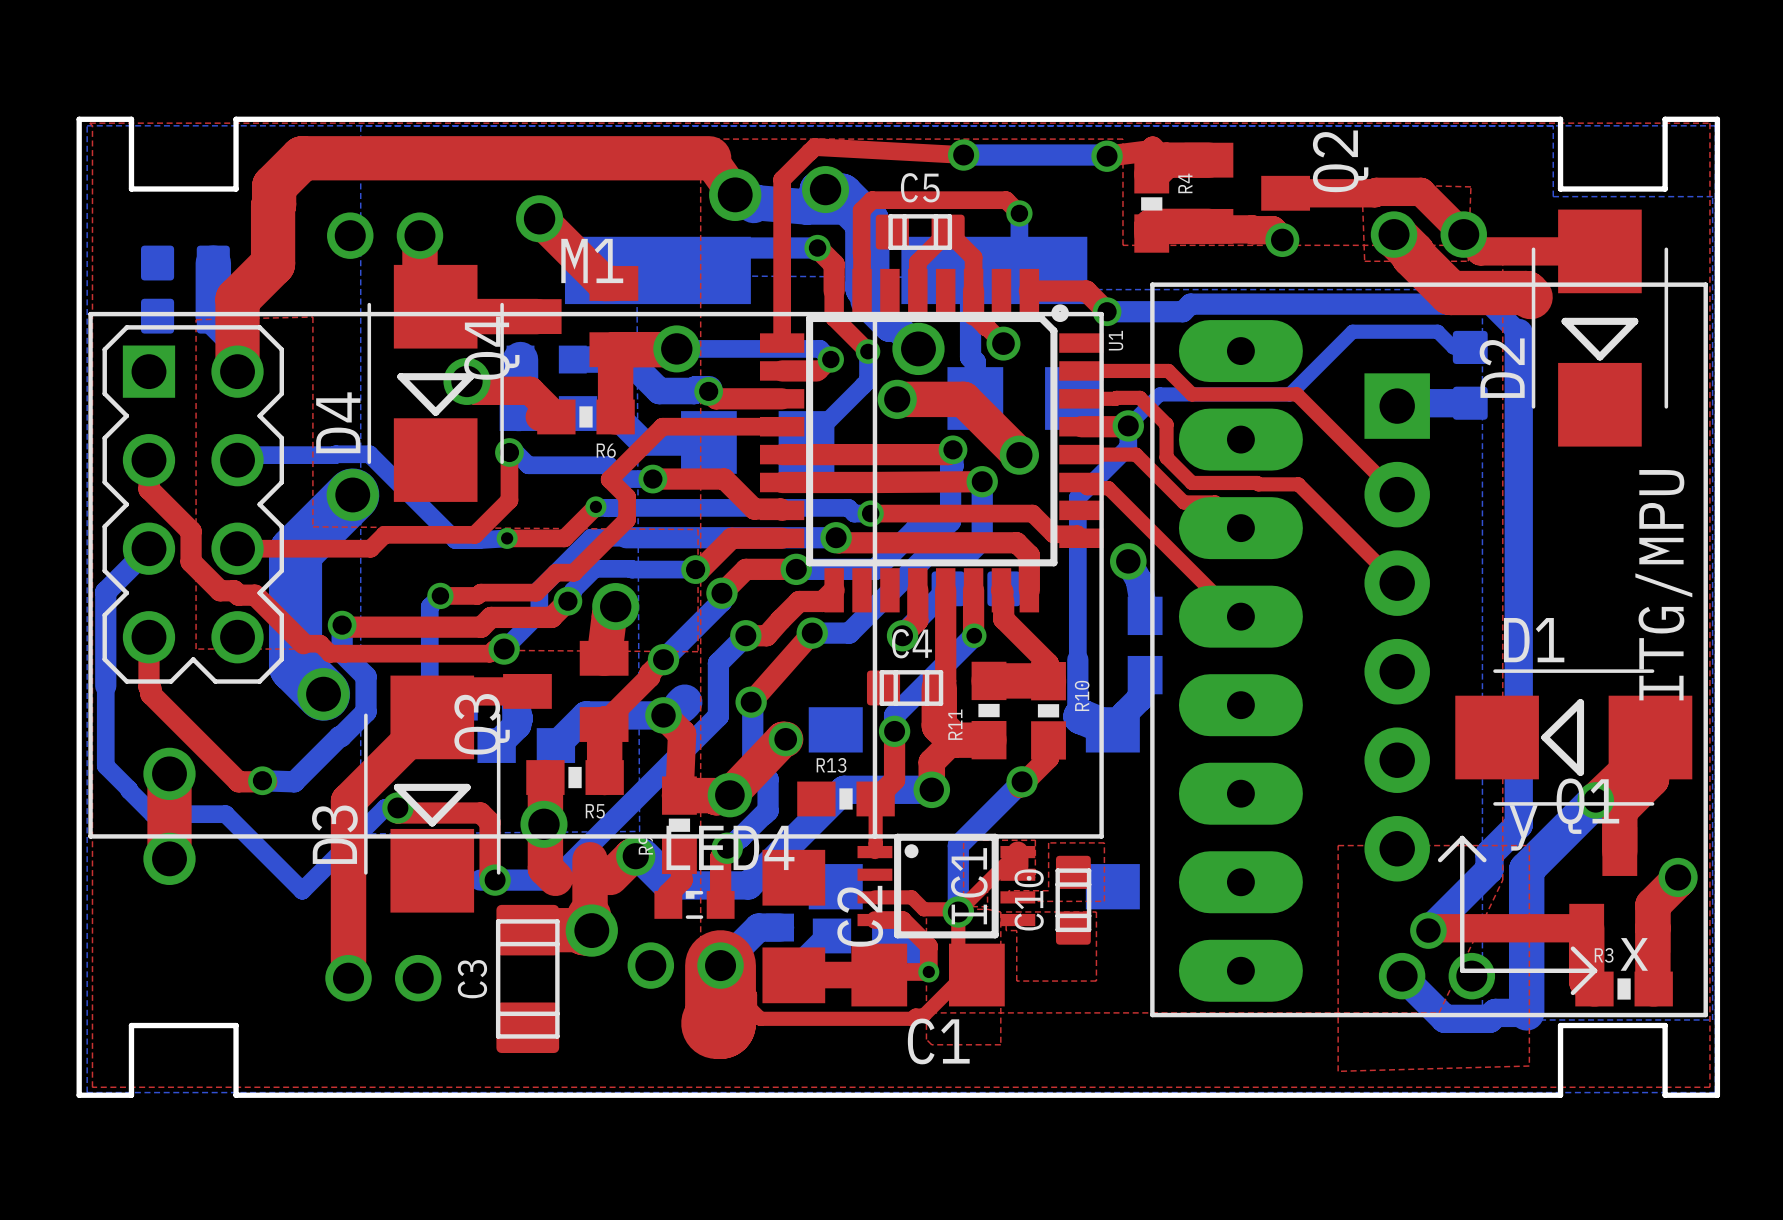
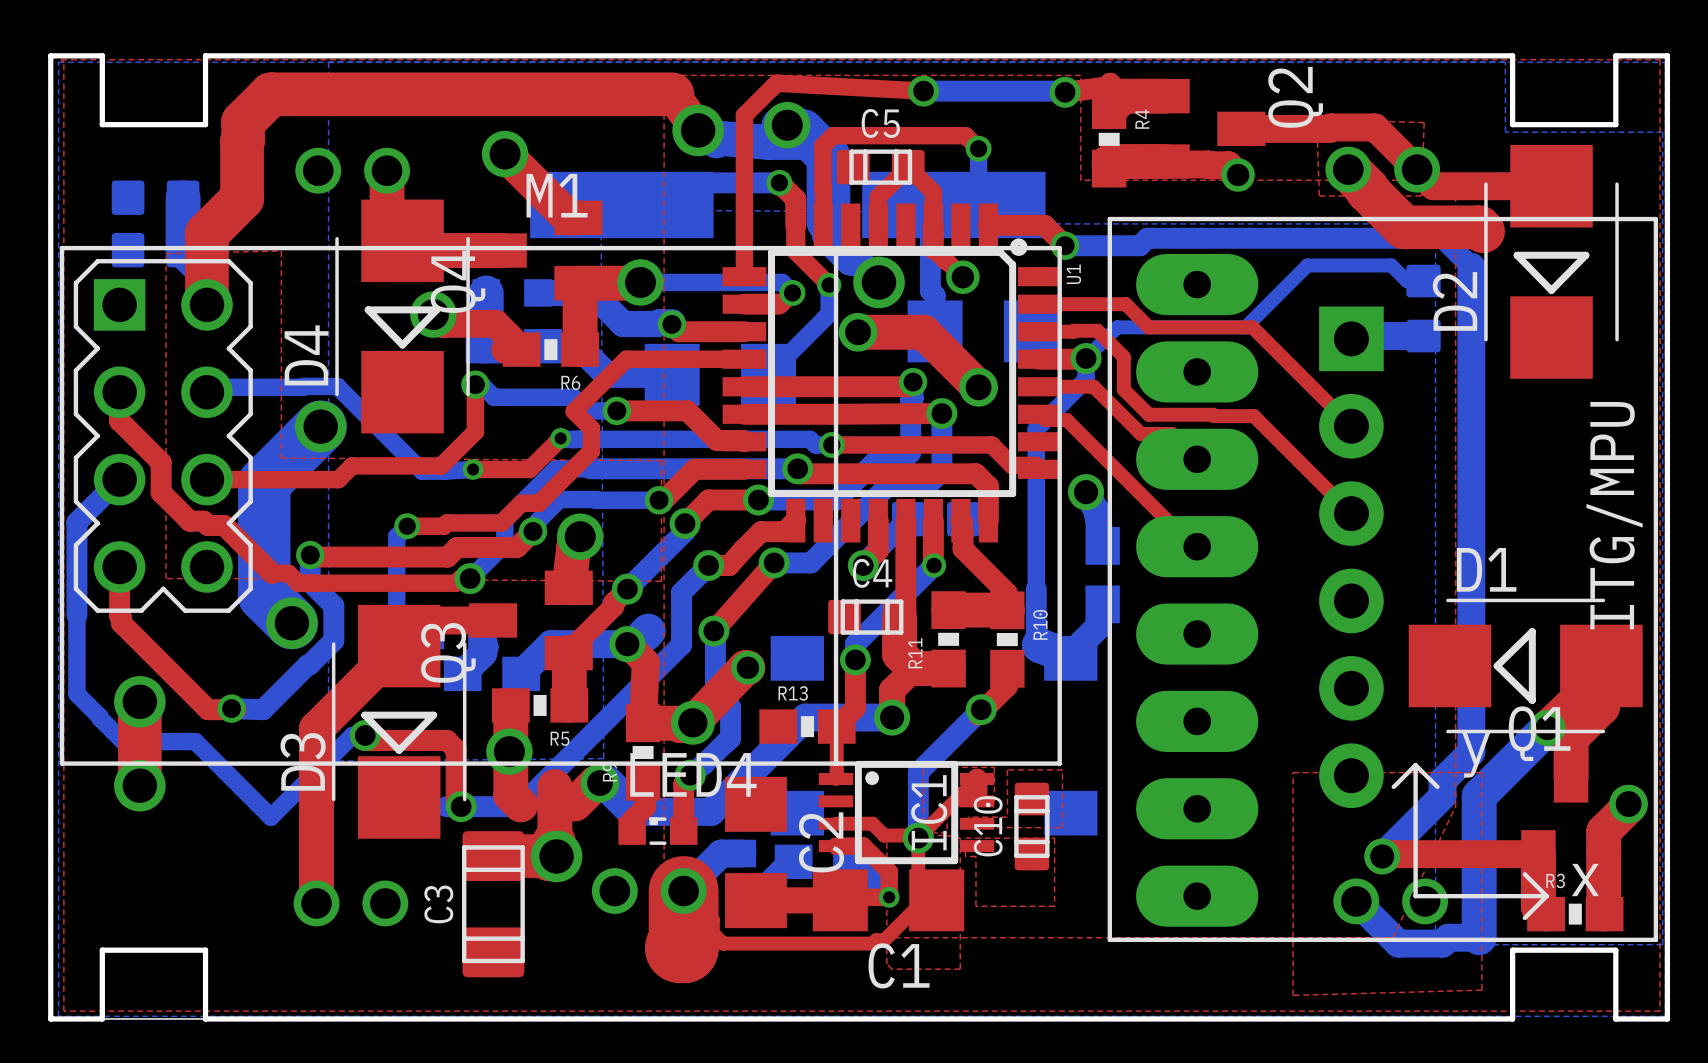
board edge: none -> (102, 1018) (205, 1018)

